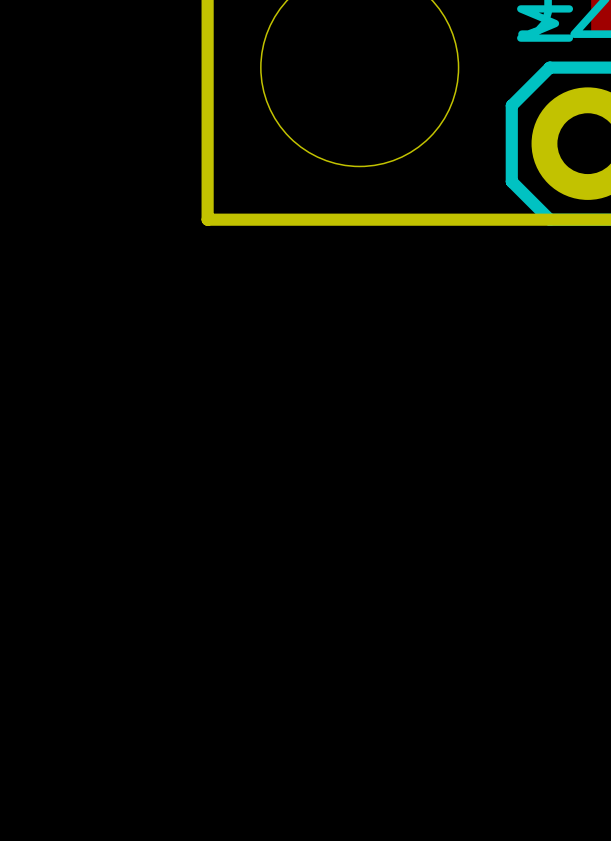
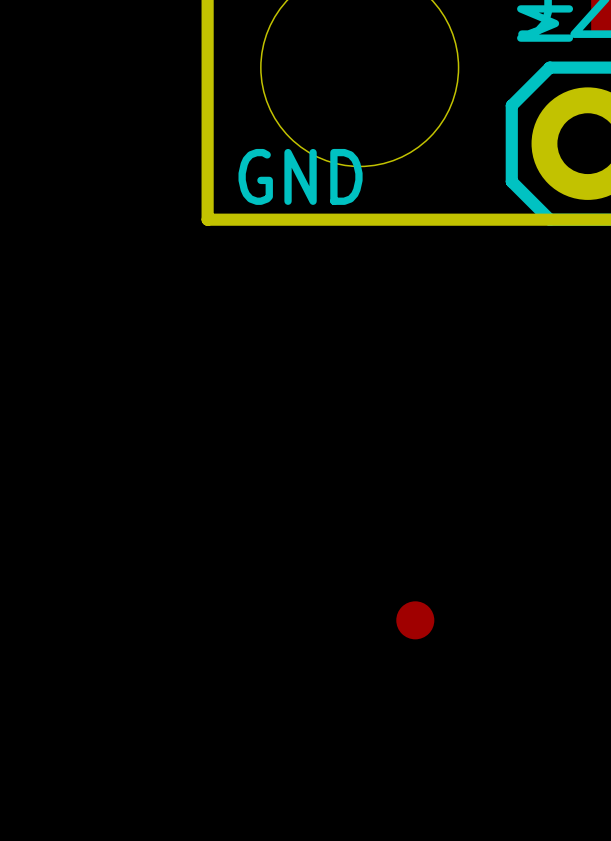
text: none -> GND (300, 176)
part: none -> (415, 620)

